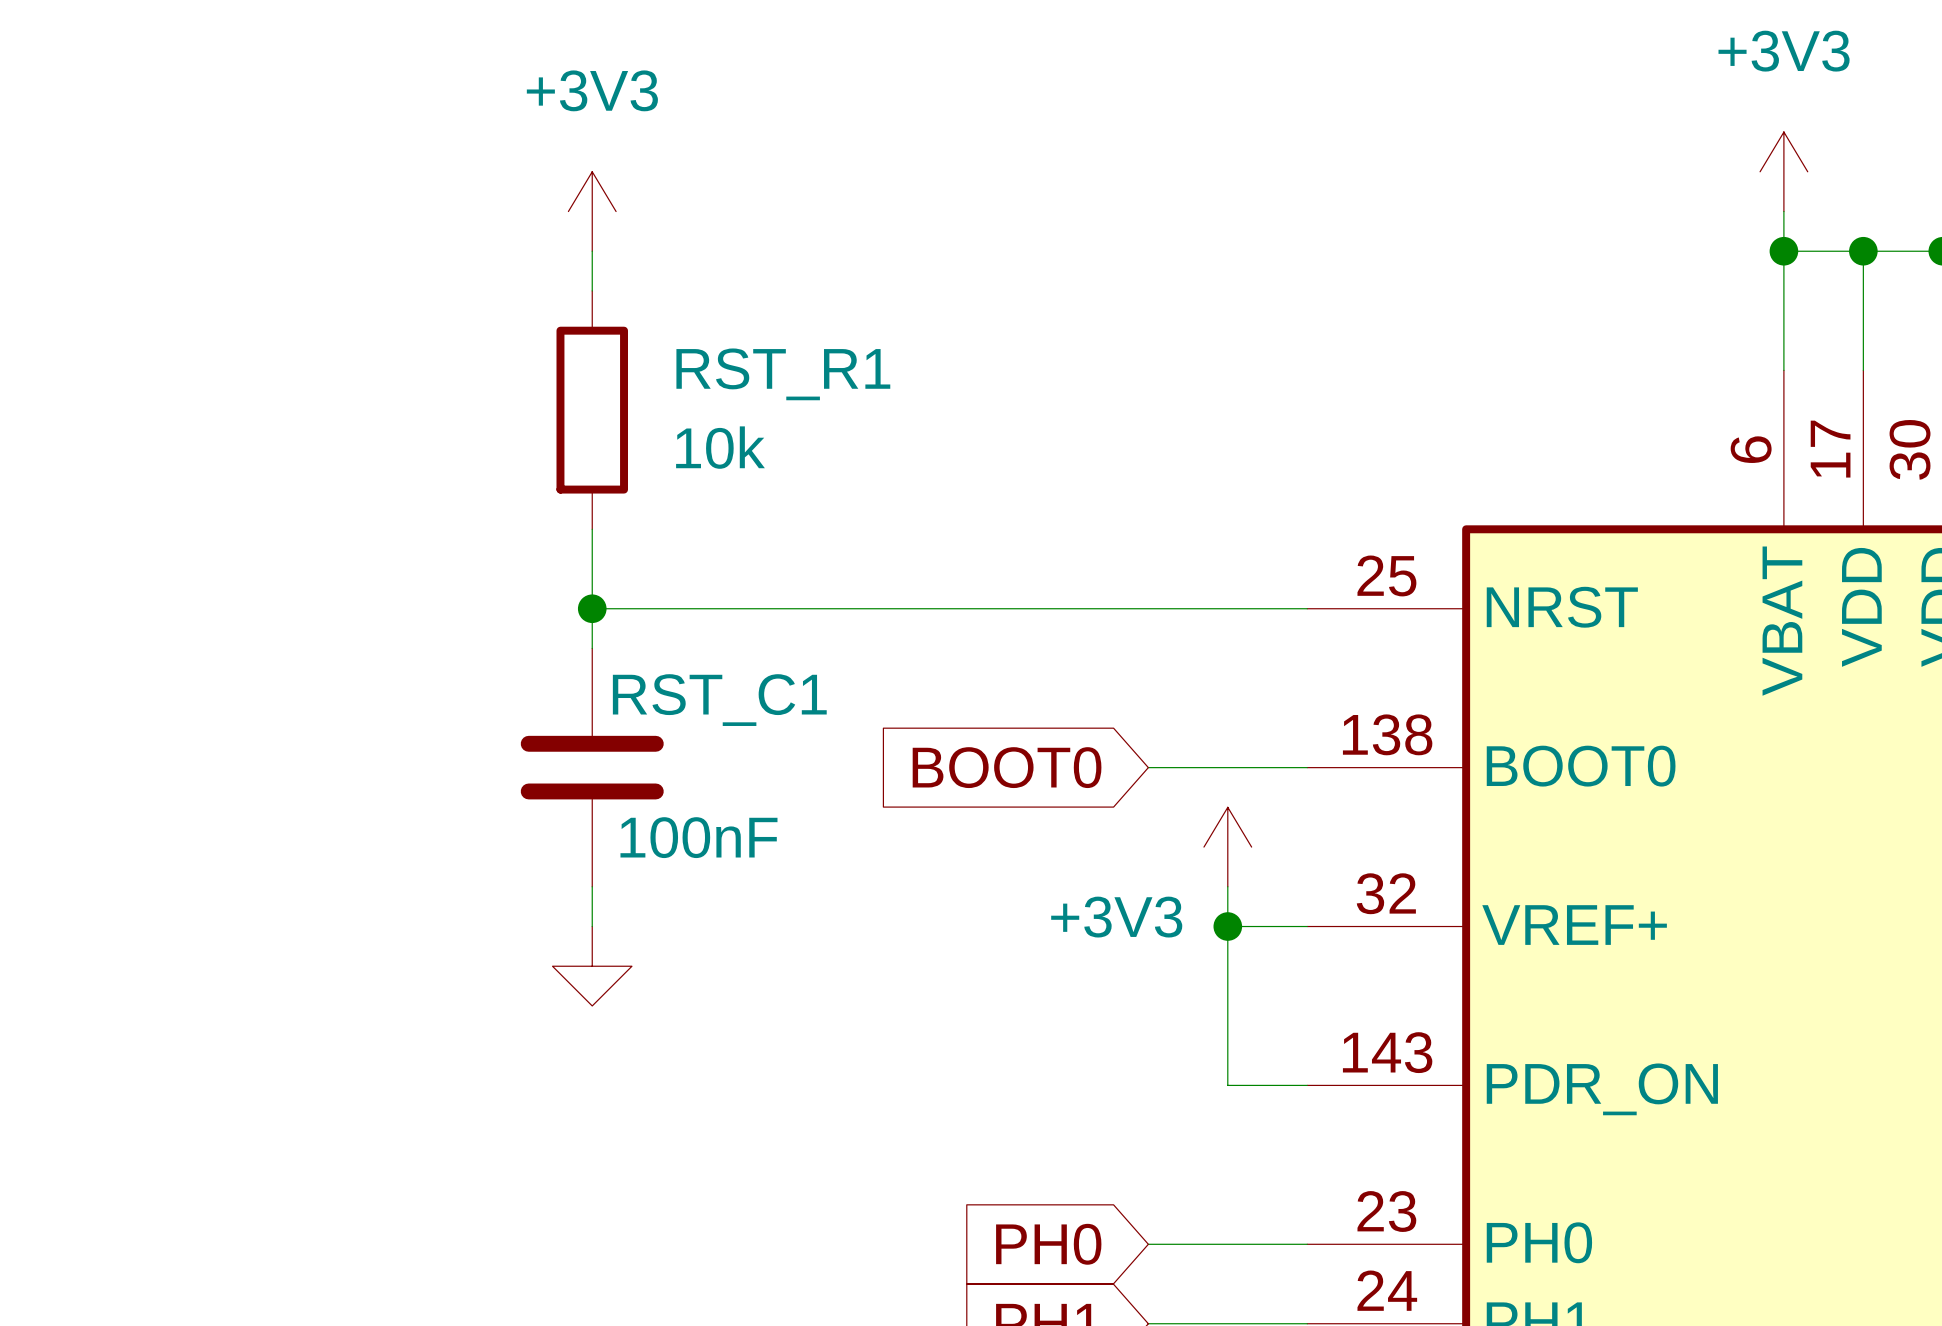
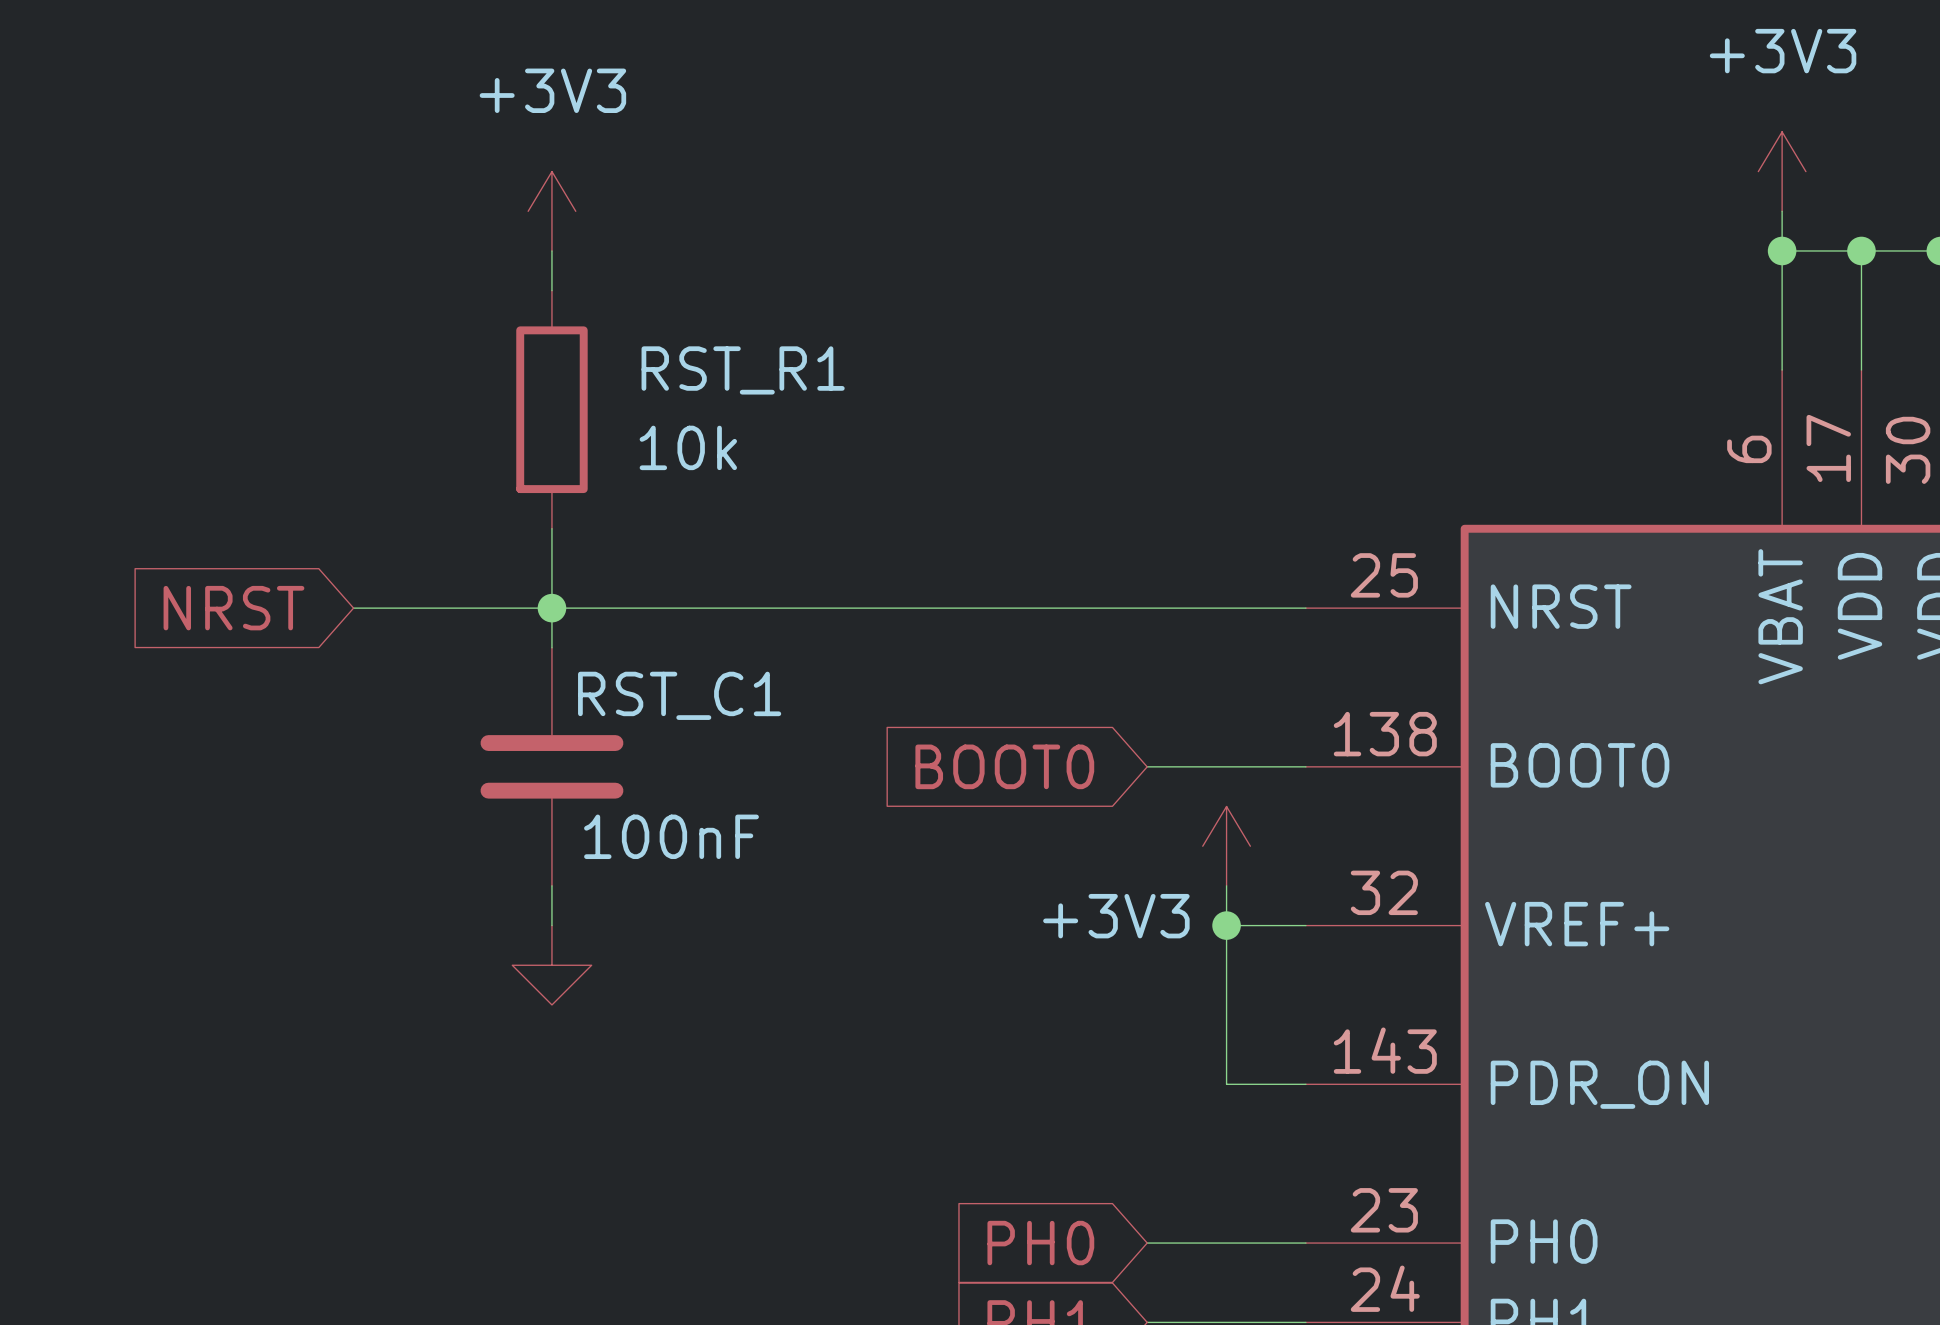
power symbol position: +3V3 (592, 211) -> +3V3 (551, 211)
wire: (592, 251) (592, 290) -> (551, 250) (551, 290)
RST_R1 position: (592, 410) -> (551, 409)
wire: (592, 529) (592, 648) -> (551, 528) (551, 647)
global label: none -> NRST (233, 608)
wire: none -> (353, 608) (591, 608)
junction position: (592, 608) -> (551, 608)
RST_C1 position: (592, 767) -> (551, 766)
wire: (592, 886) (592, 926) -> (551, 885) (551, 925)
power symbol position: (592, 966) -> (551, 965)

